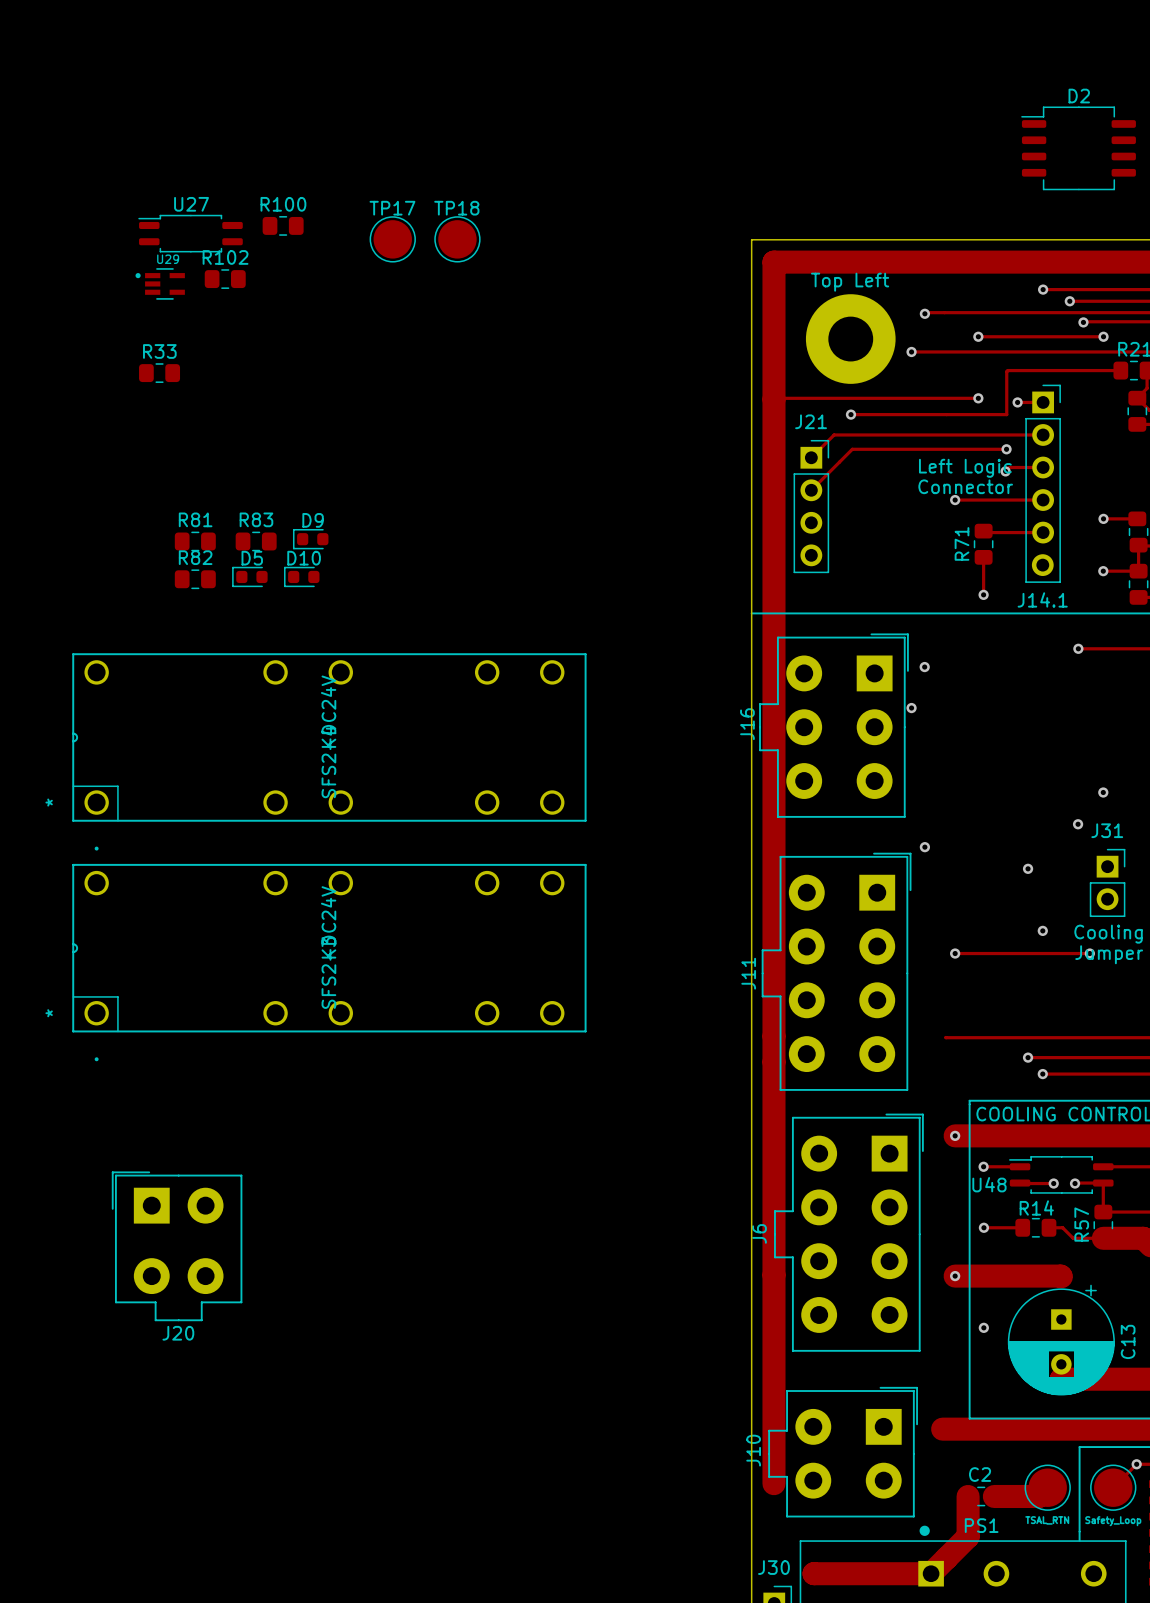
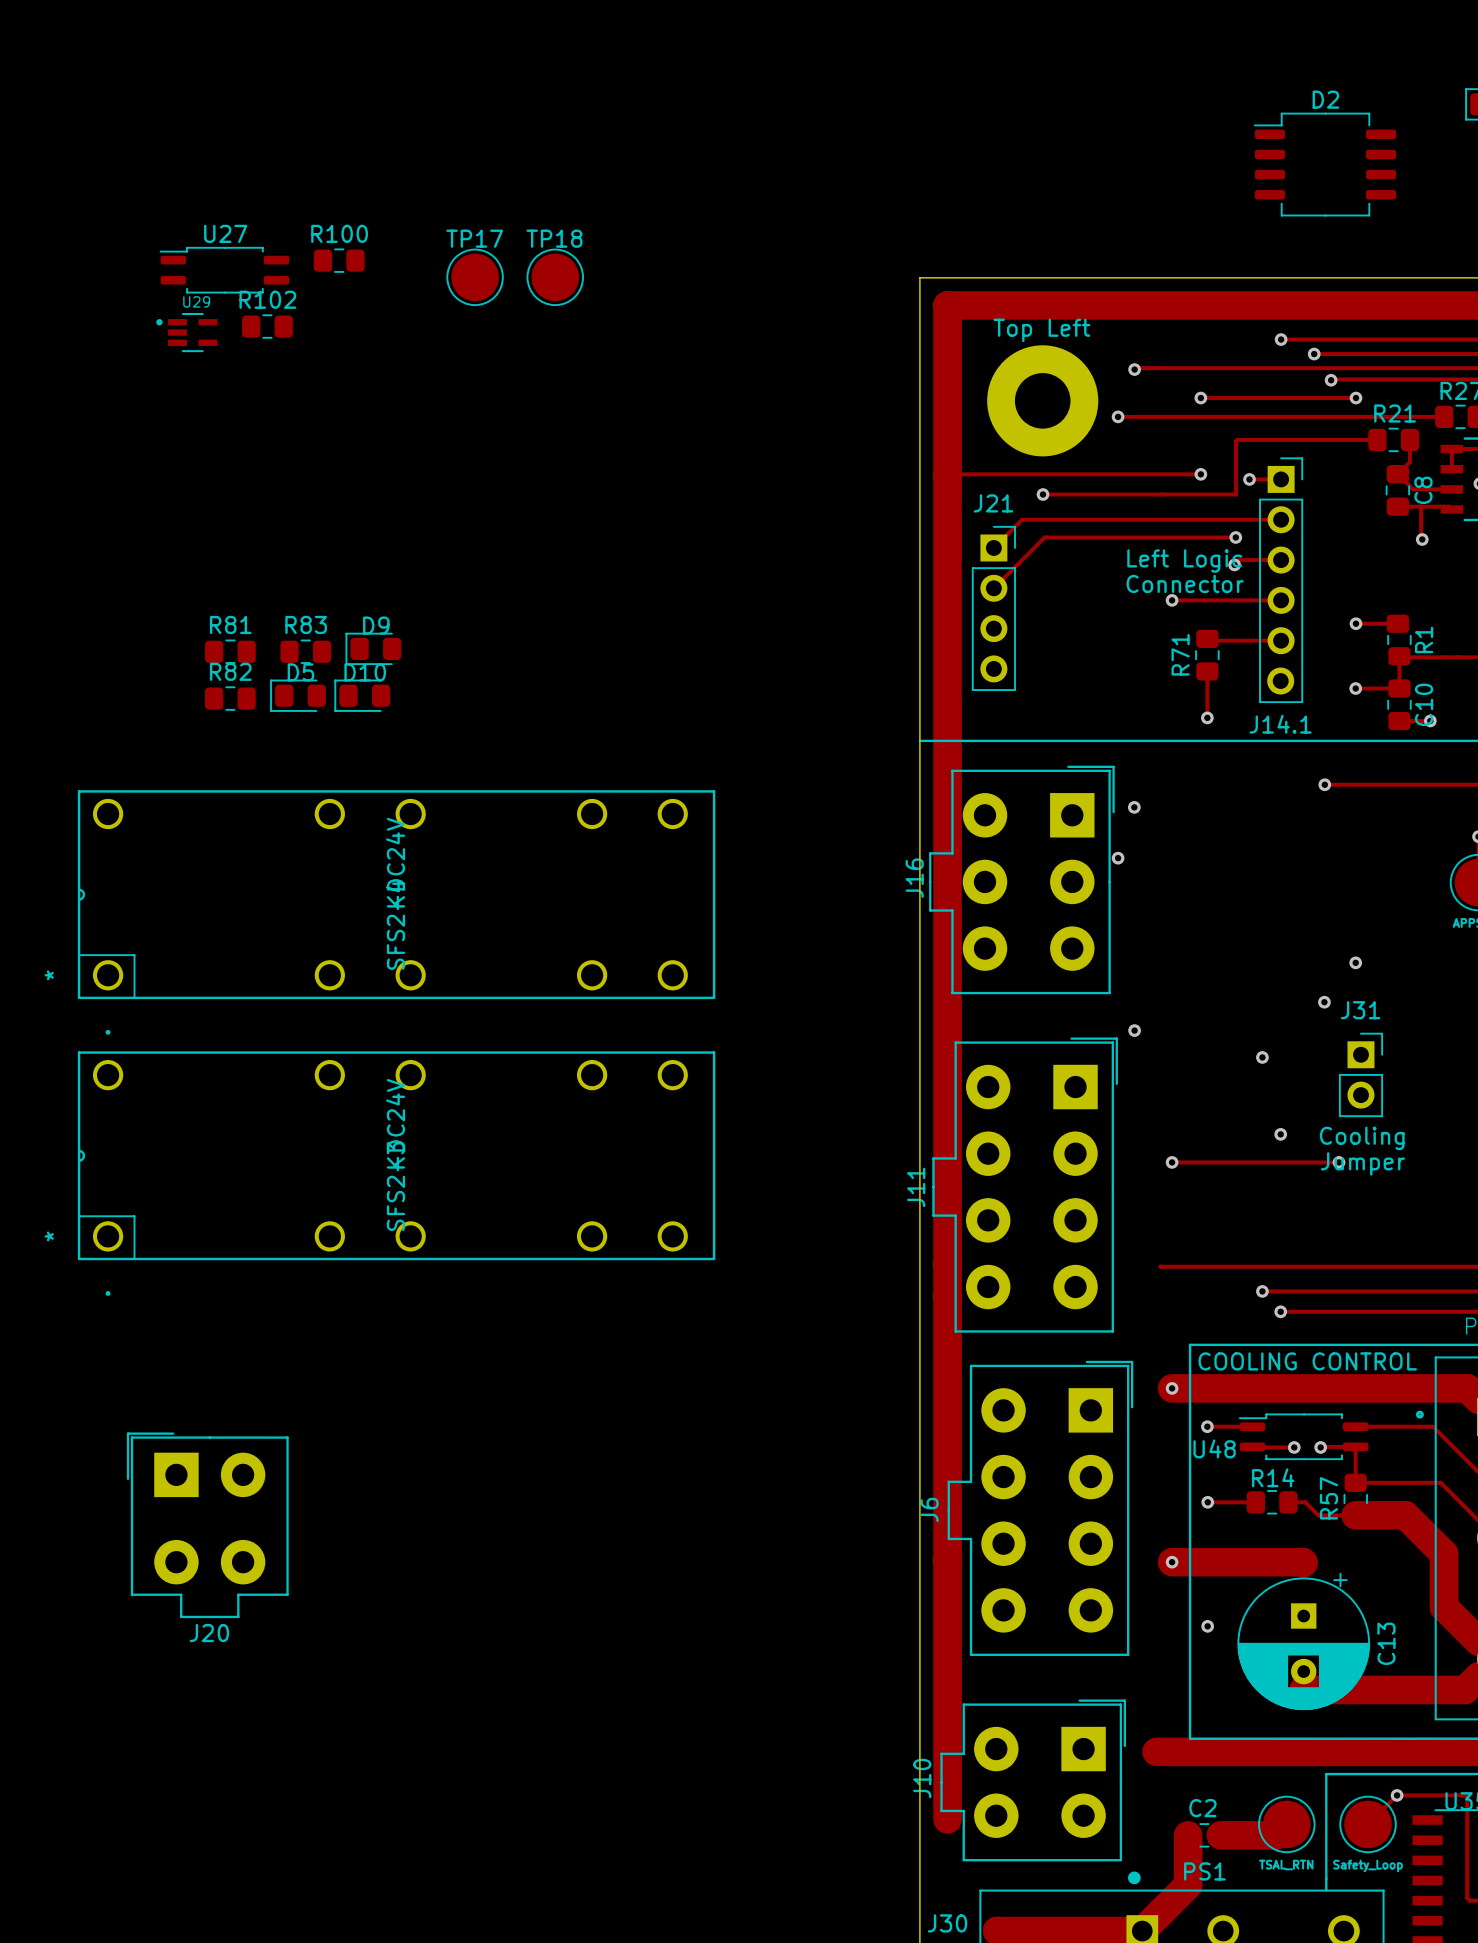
R33: (159, 373) -> none
D9 footprint: [292, 528, 329, 550] -> [345, 632, 402, 666]
D5 footprint: [232, 566, 268, 588] -> [270, 679, 326, 712]
D10 footprint: [284, 566, 320, 588] -> [334, 679, 391, 712]

